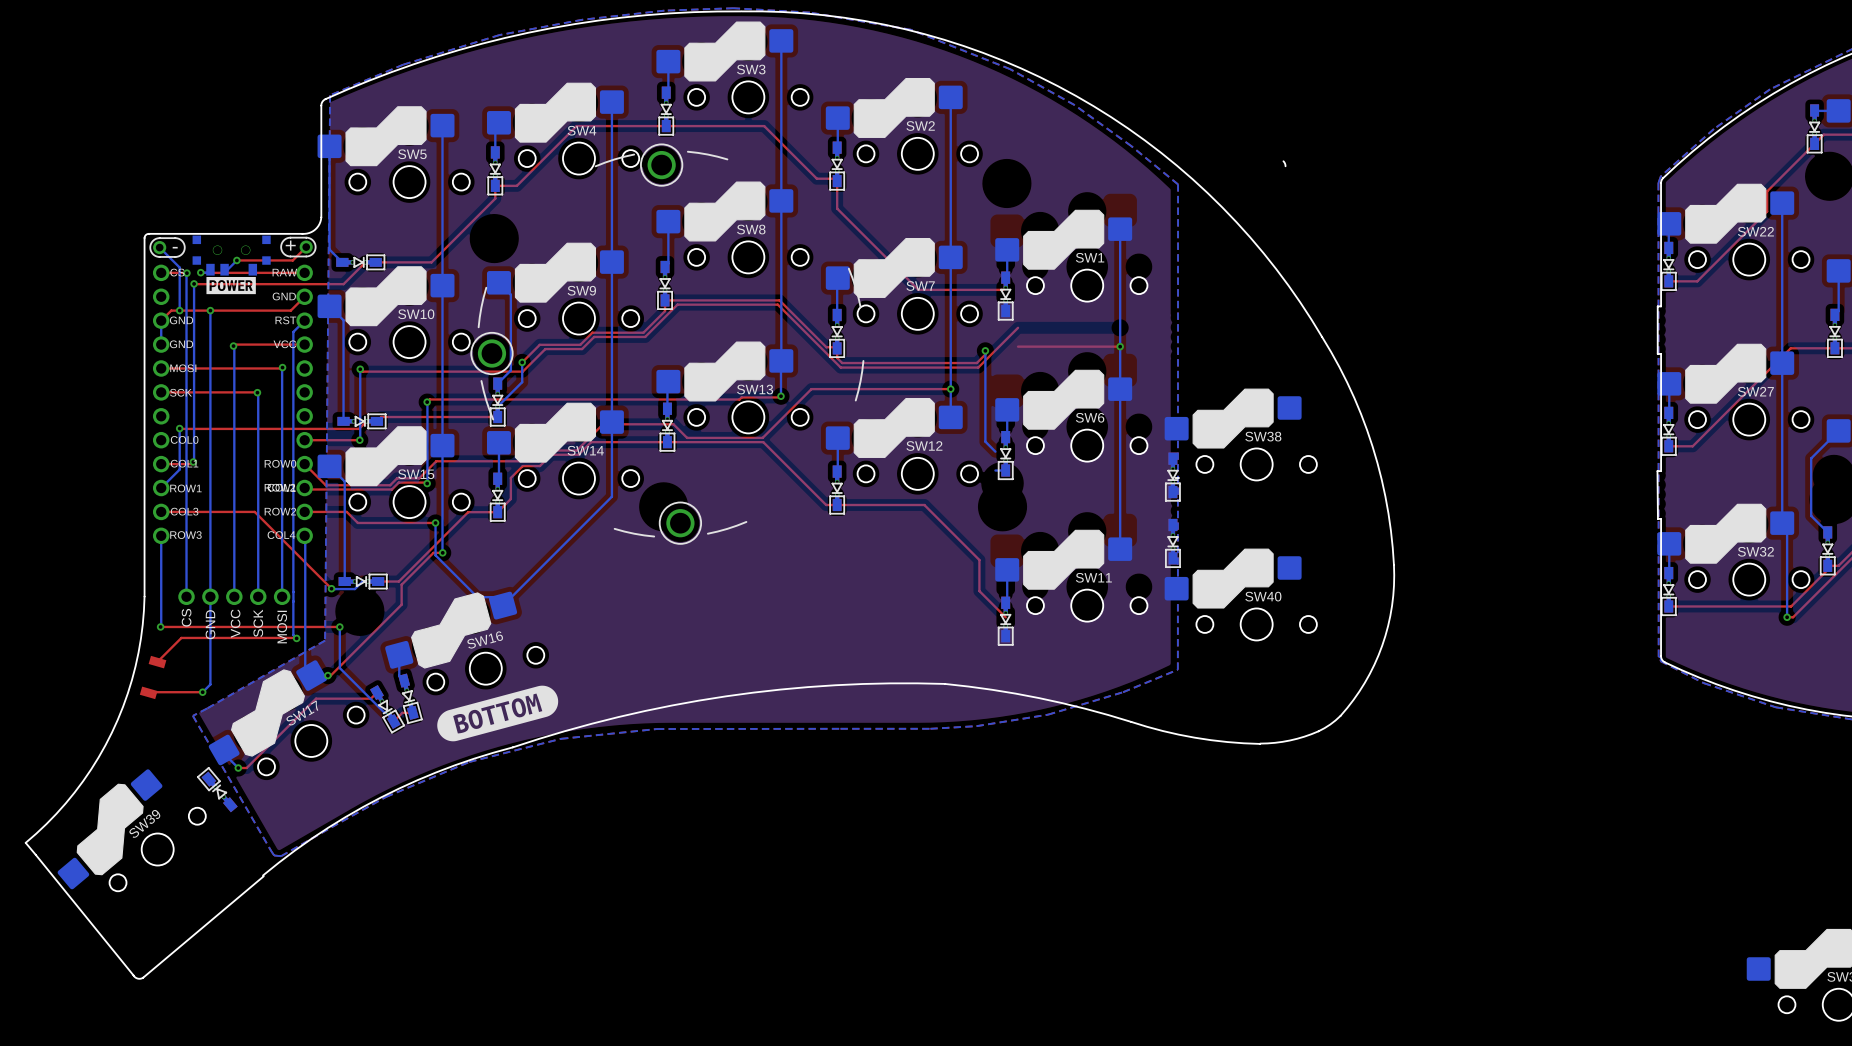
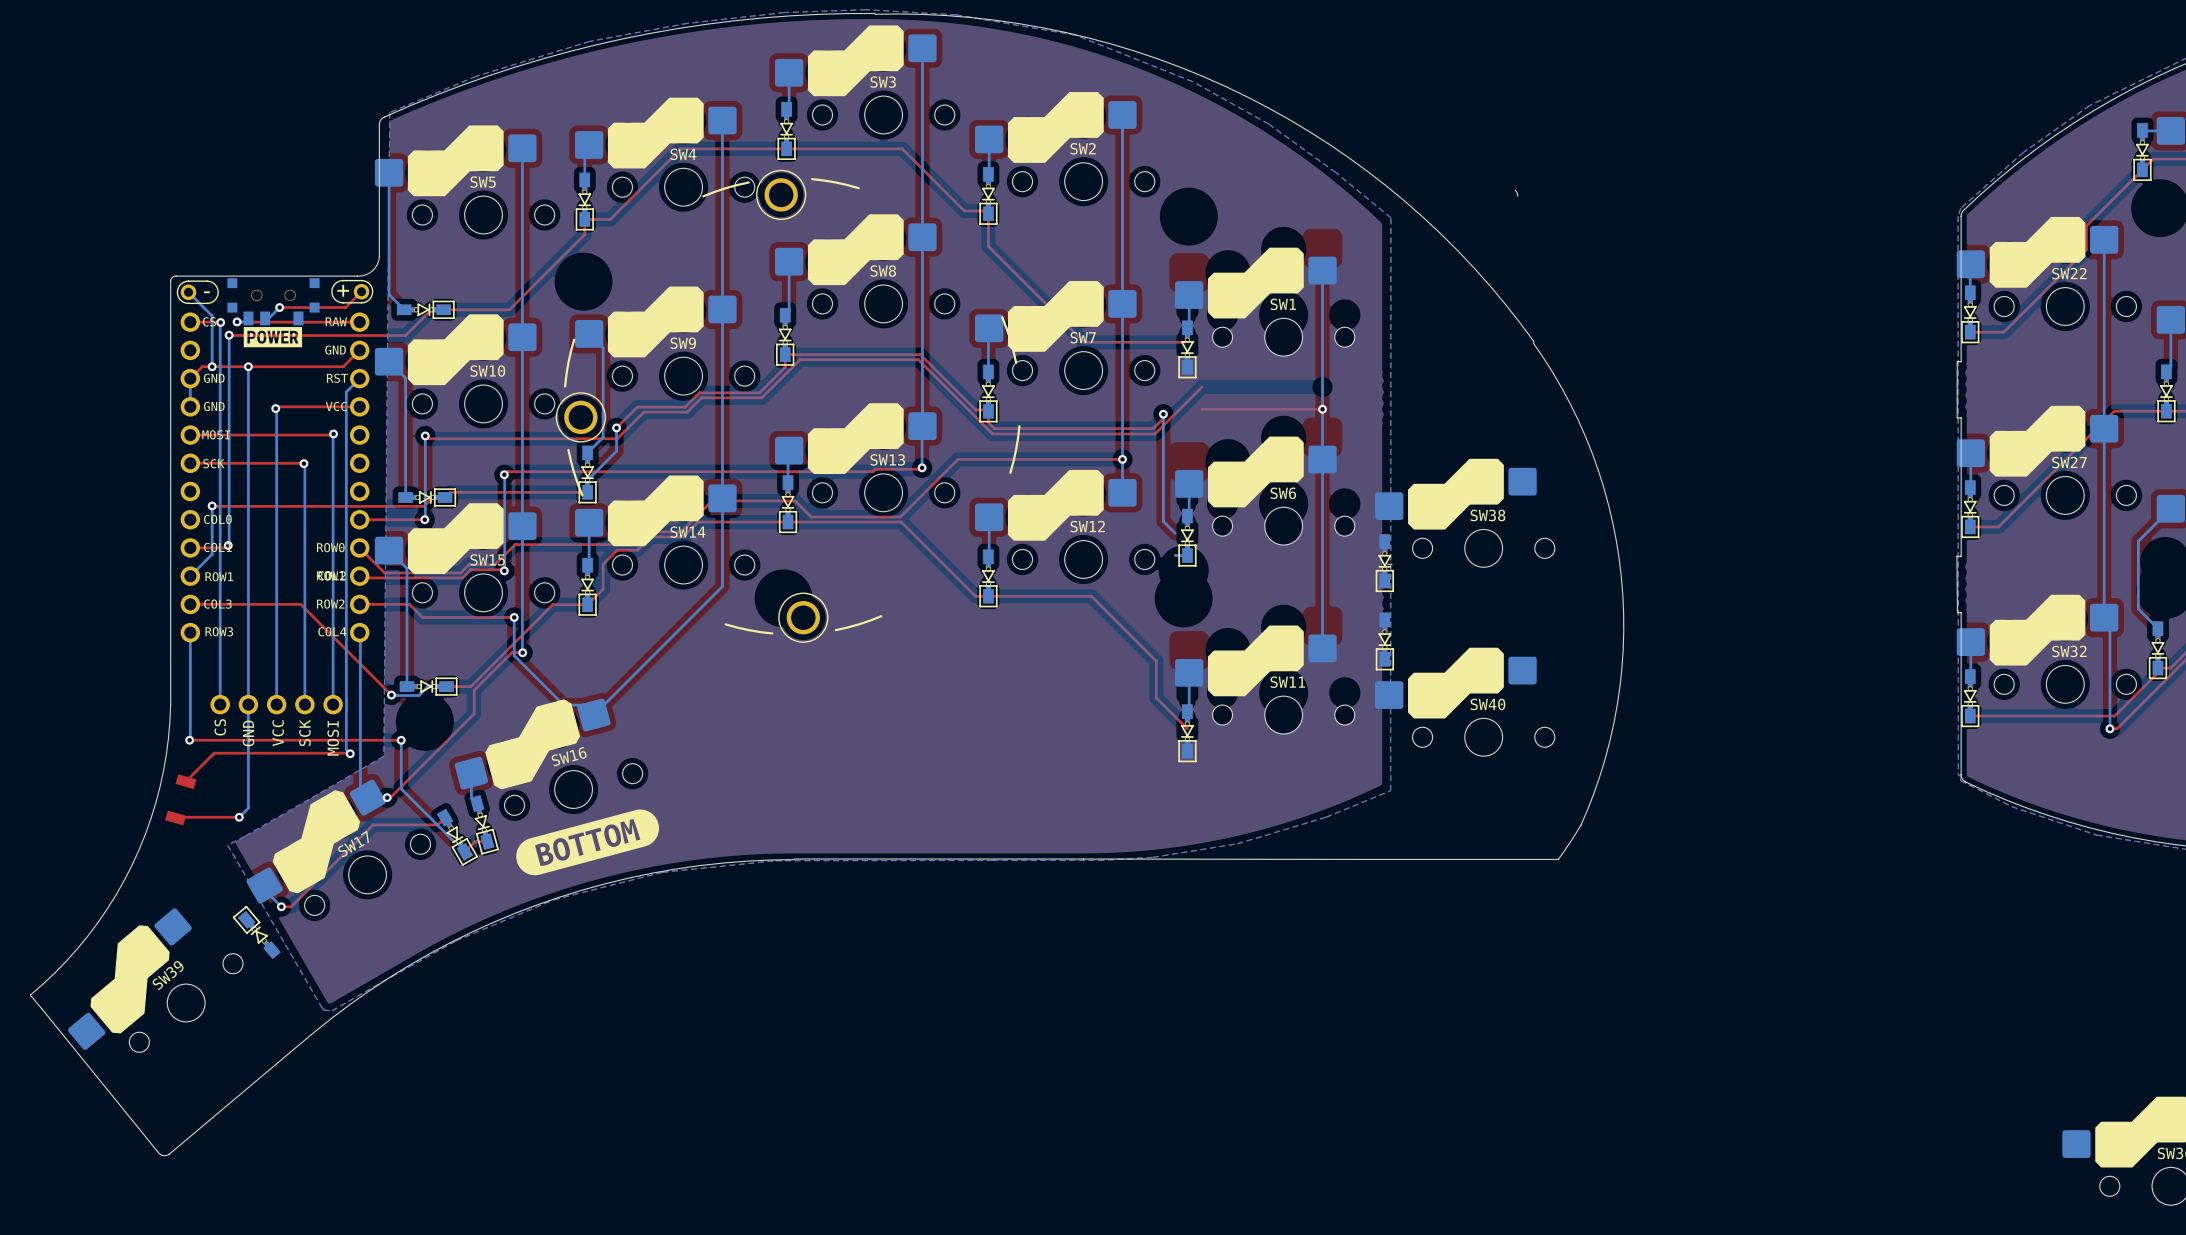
board edge: (741, 11) (823, 15) (904, 29) (983, 52) (1058, 86) (1128, 128) (1177, 165) (1236, 222) (1288, 285) (1339, 367) (1367, 430) (1381, 479) (1388, 513) (1392, 547) (1394, 585) (1390, 616) (1378, 655) (1364, 682) (1347, 708) (1330, 724) (1311, 734) (1289, 740) (1260, 743) -> none
board edge: none -> (875, 14) (970, 17) (1065, 32) (1157, 58) (1245, 96) (1328, 143) (1404, 201) (1473, 267) (1534, 342)
board edge: none -> (1533, 342) (1570, 404) (1598, 471) (1616, 541) (1622, 595) (1621, 667) (1610, 739) (1600, 774) (1581, 824) (1558, 859) (794, 859)
board edge: none -> (794, 859) (723, 863) (652, 873) (605, 883) (537, 904) (471, 932) (408, 965) (348, 1005) (311, 1034)
board edge: (1260, 743) (1227, 742) (1178, 734) (1039, 698) (945, 683) (835, 685) (753, 692) (698, 700) (618, 717) (565, 731) (454, 765) (417, 780) (362, 807) (311, 838) (263, 875) -> none

